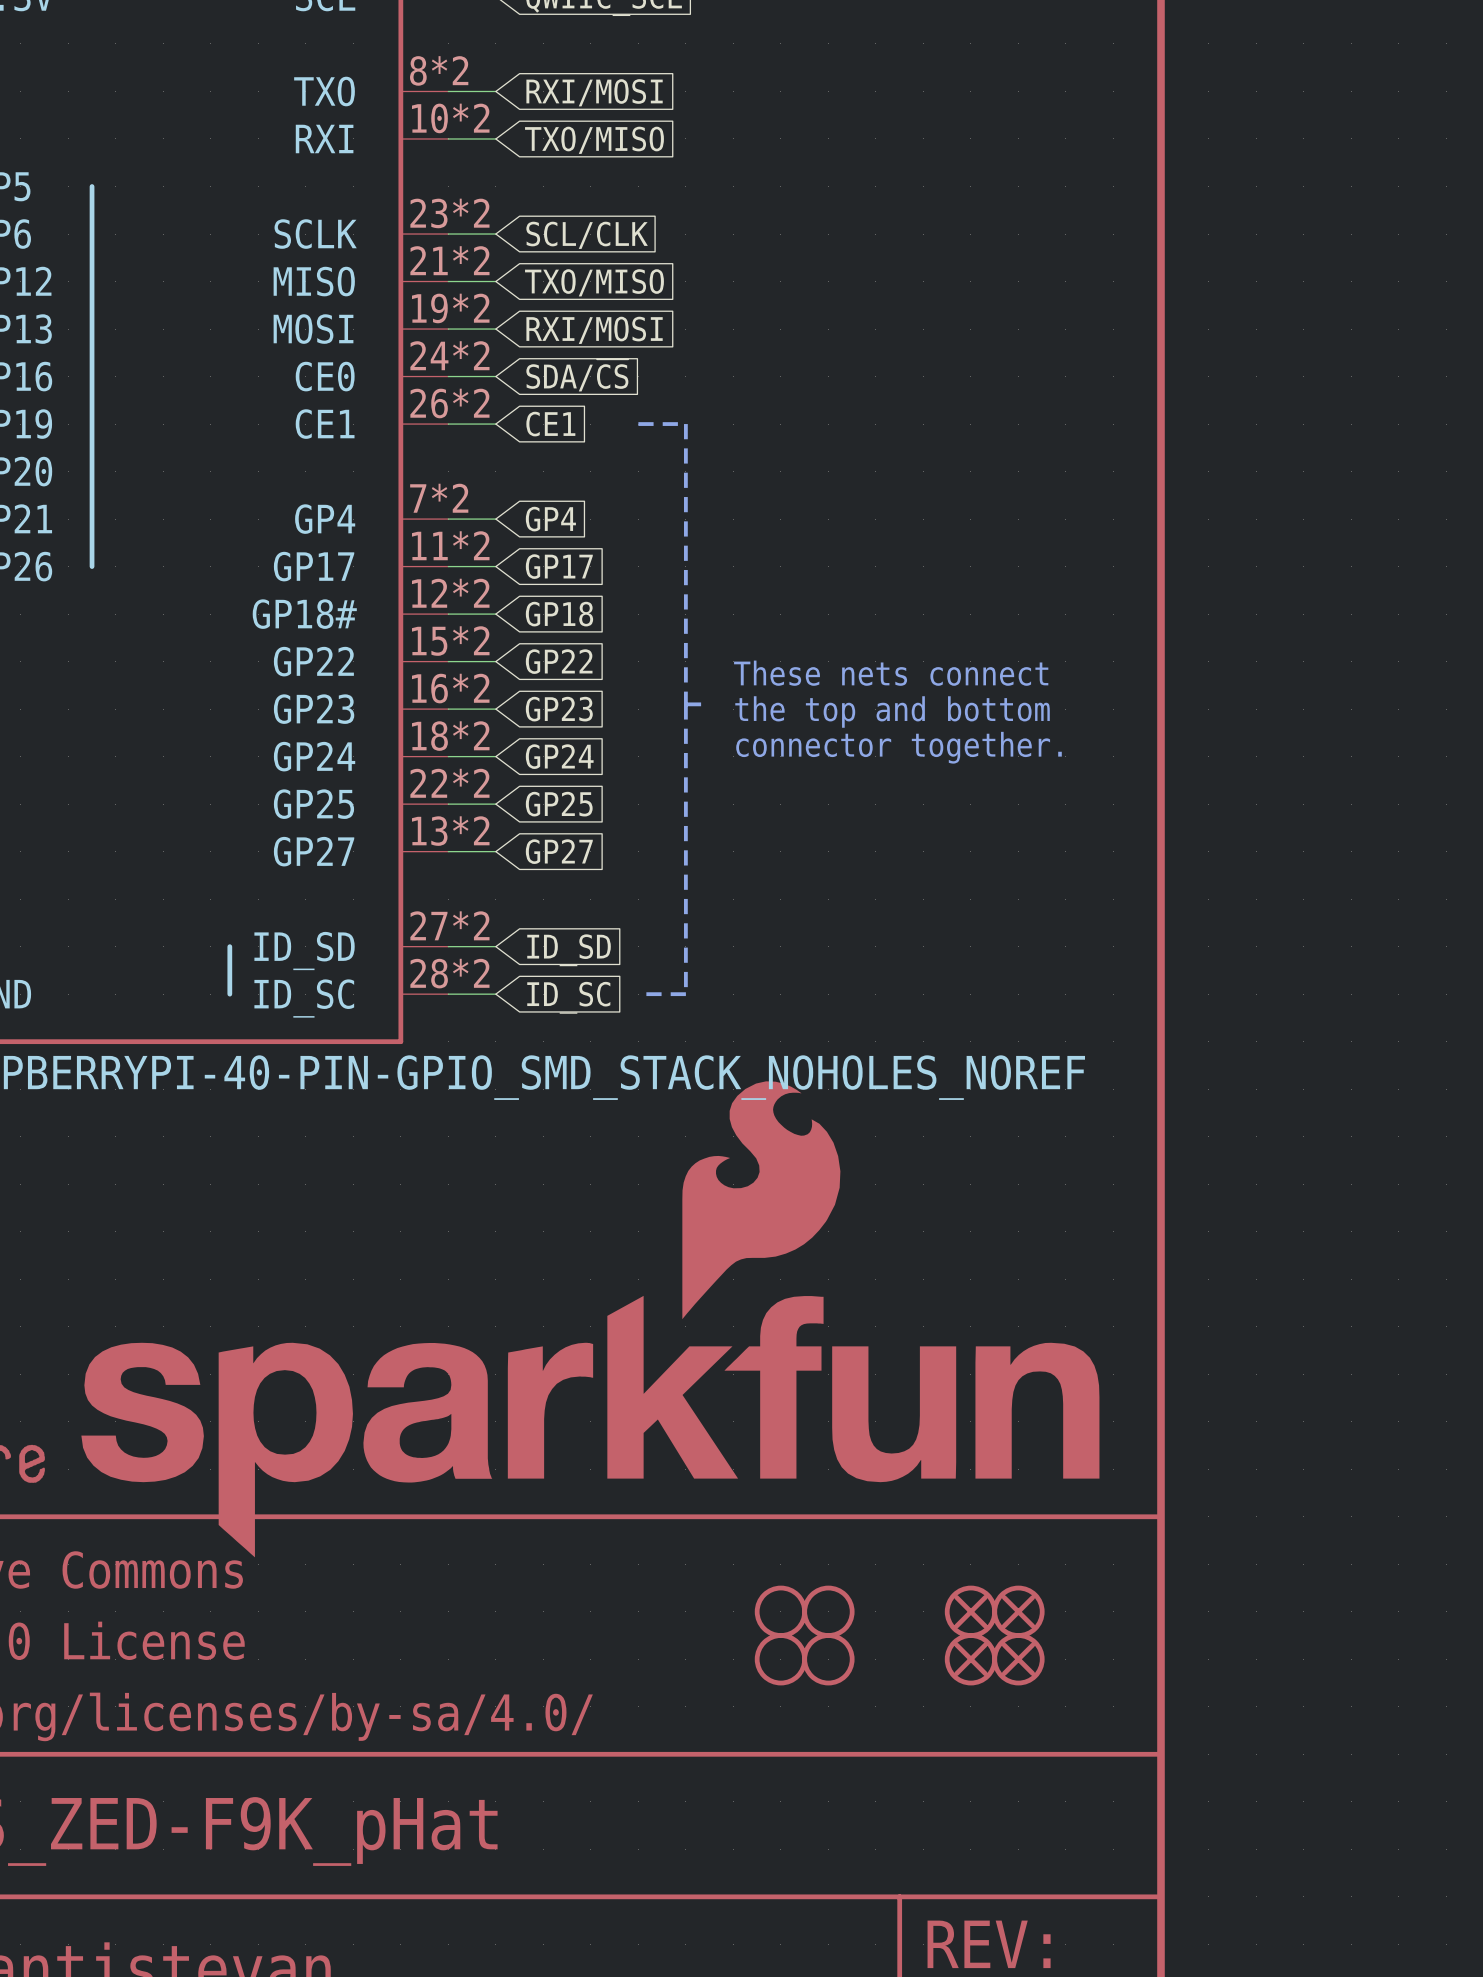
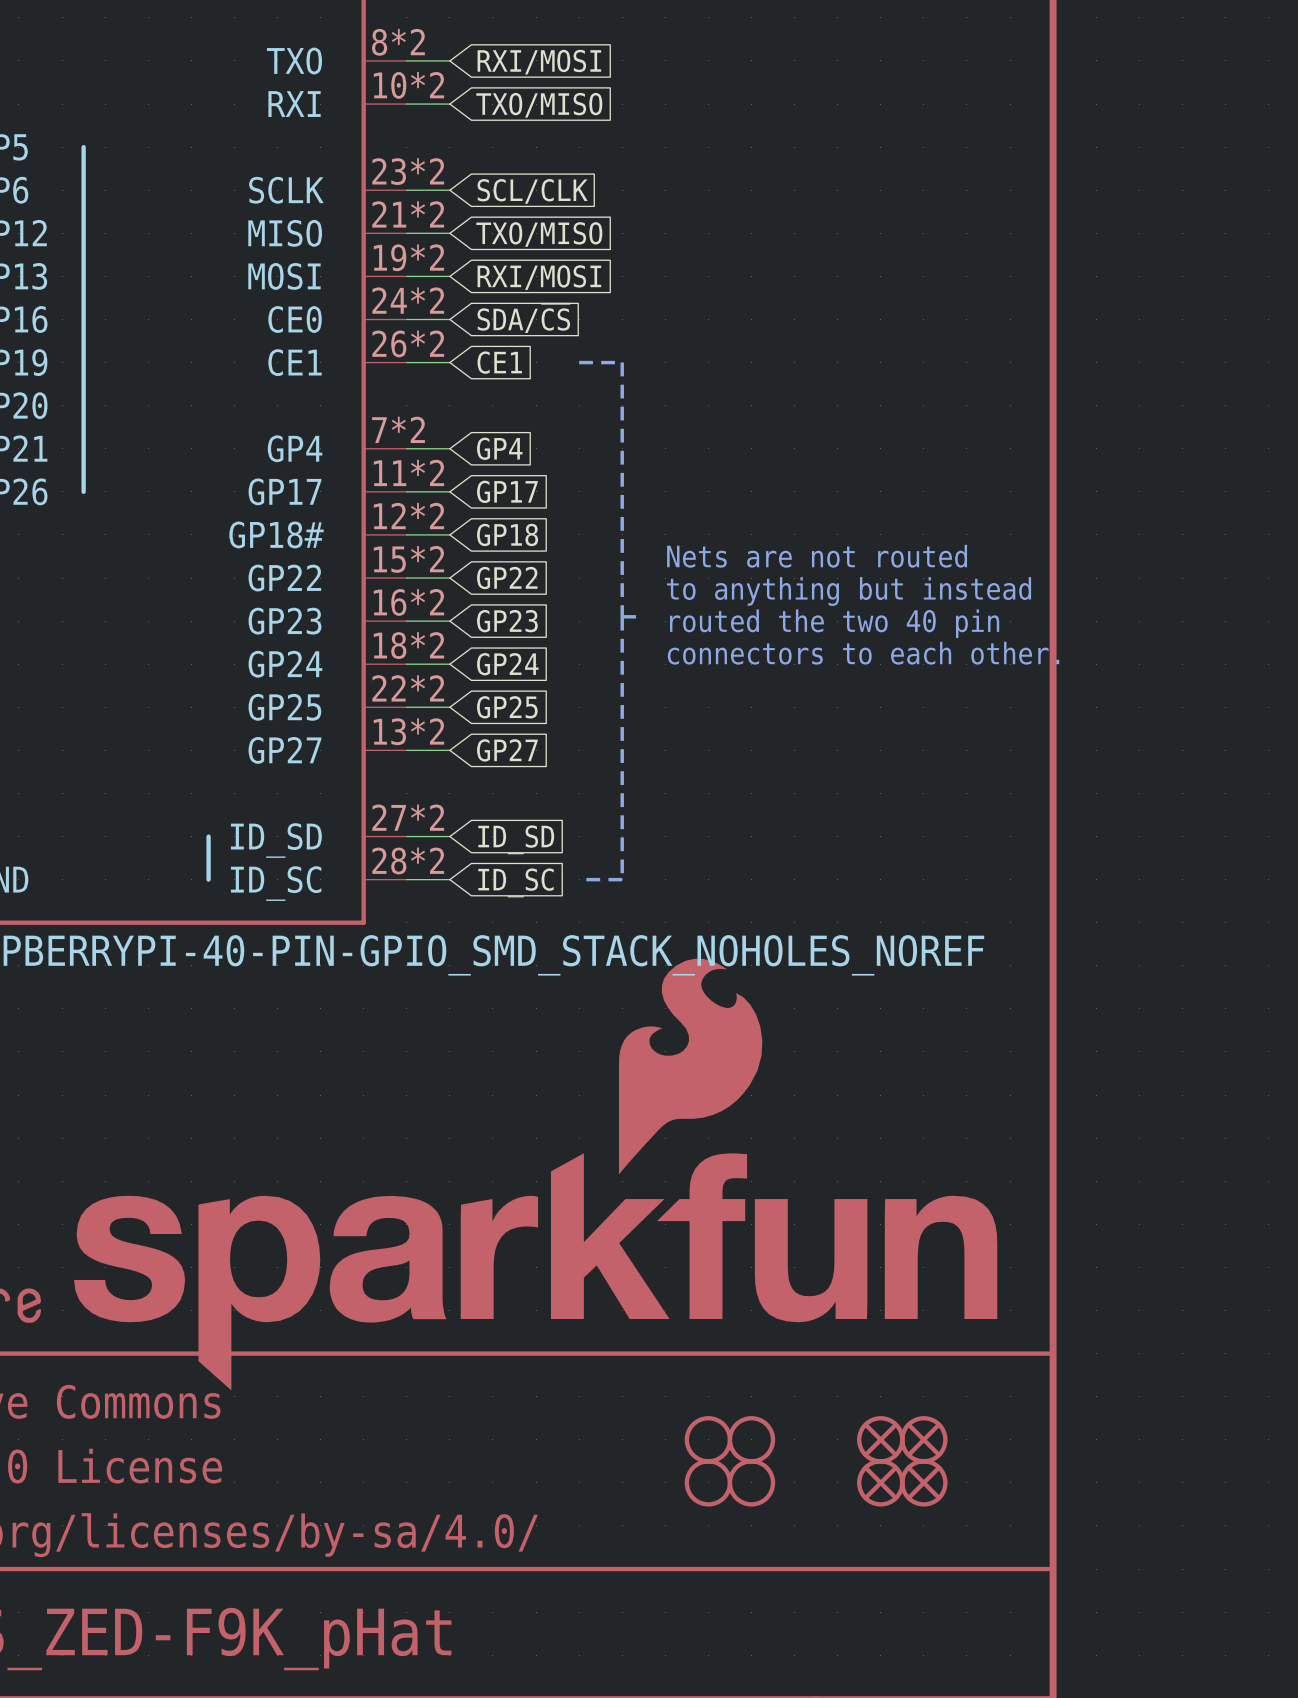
text: none -> Nets are not routed (817, 556)
text: These nets connect (891, 673) -> to anything but instead (849, 591)
text: the top and bottom (892, 711) -> routed the two 40 pin (834, 623)
text: connector together. (899, 747) -> connectors to each other. (863, 653)

